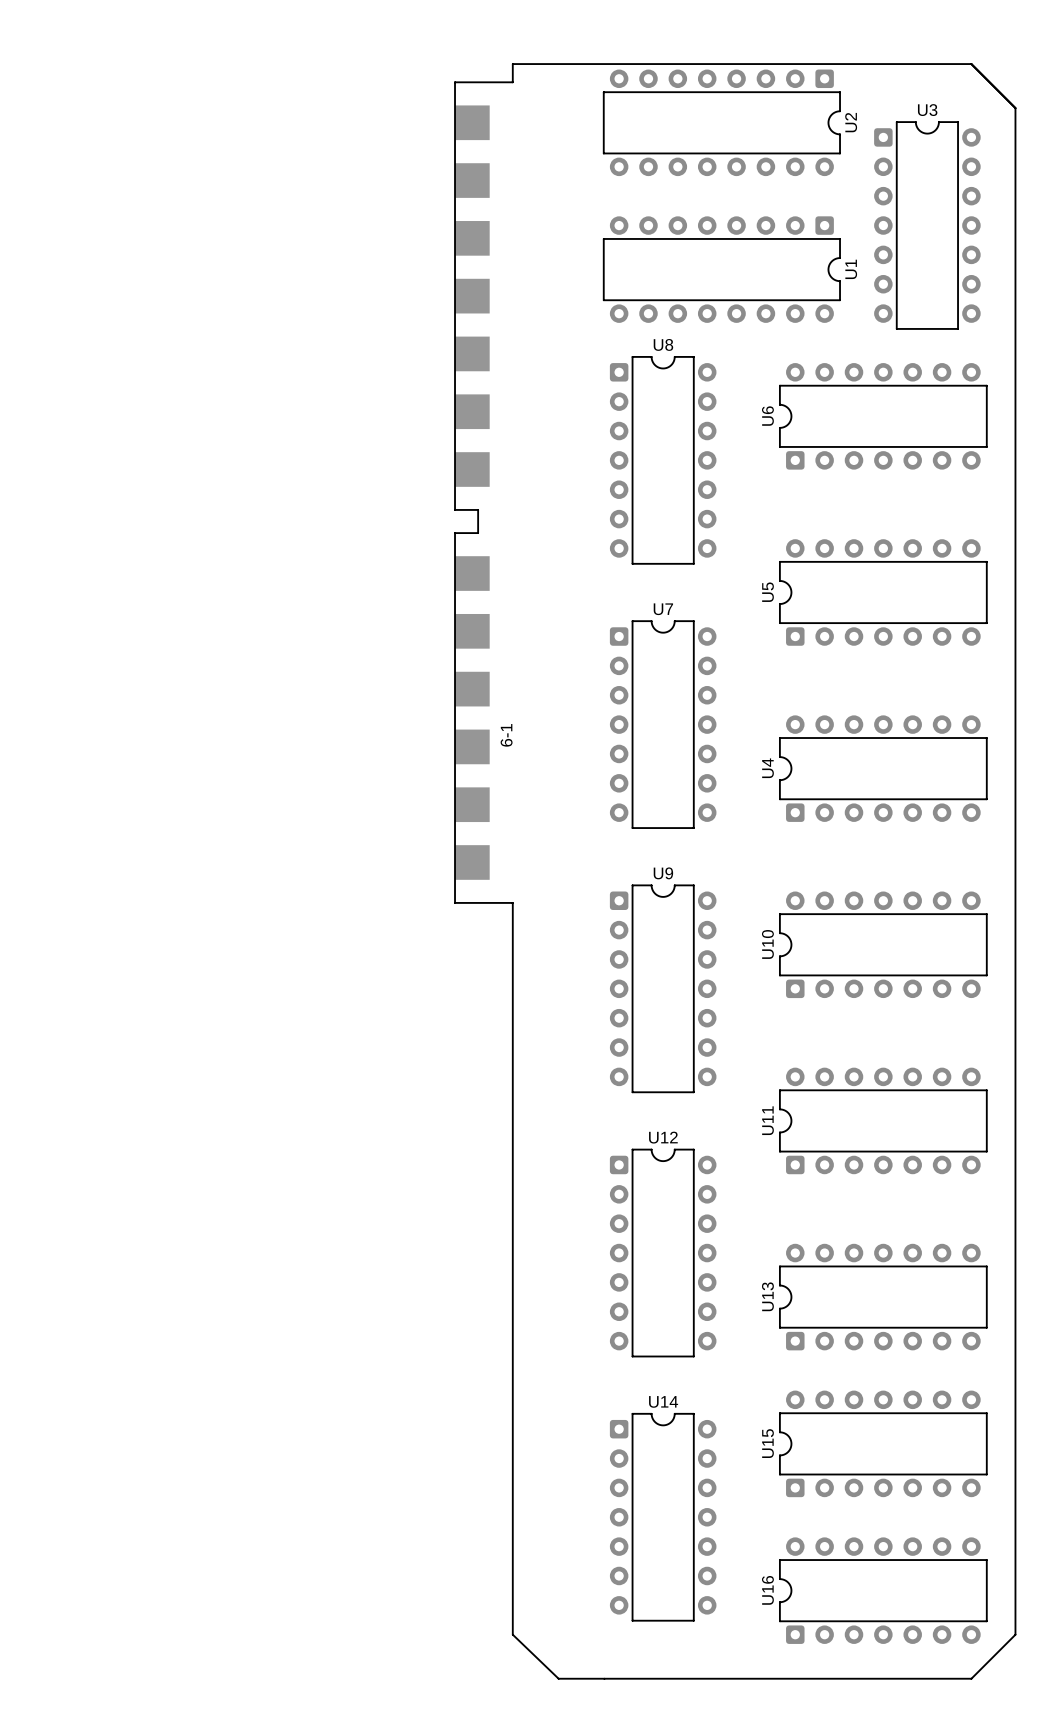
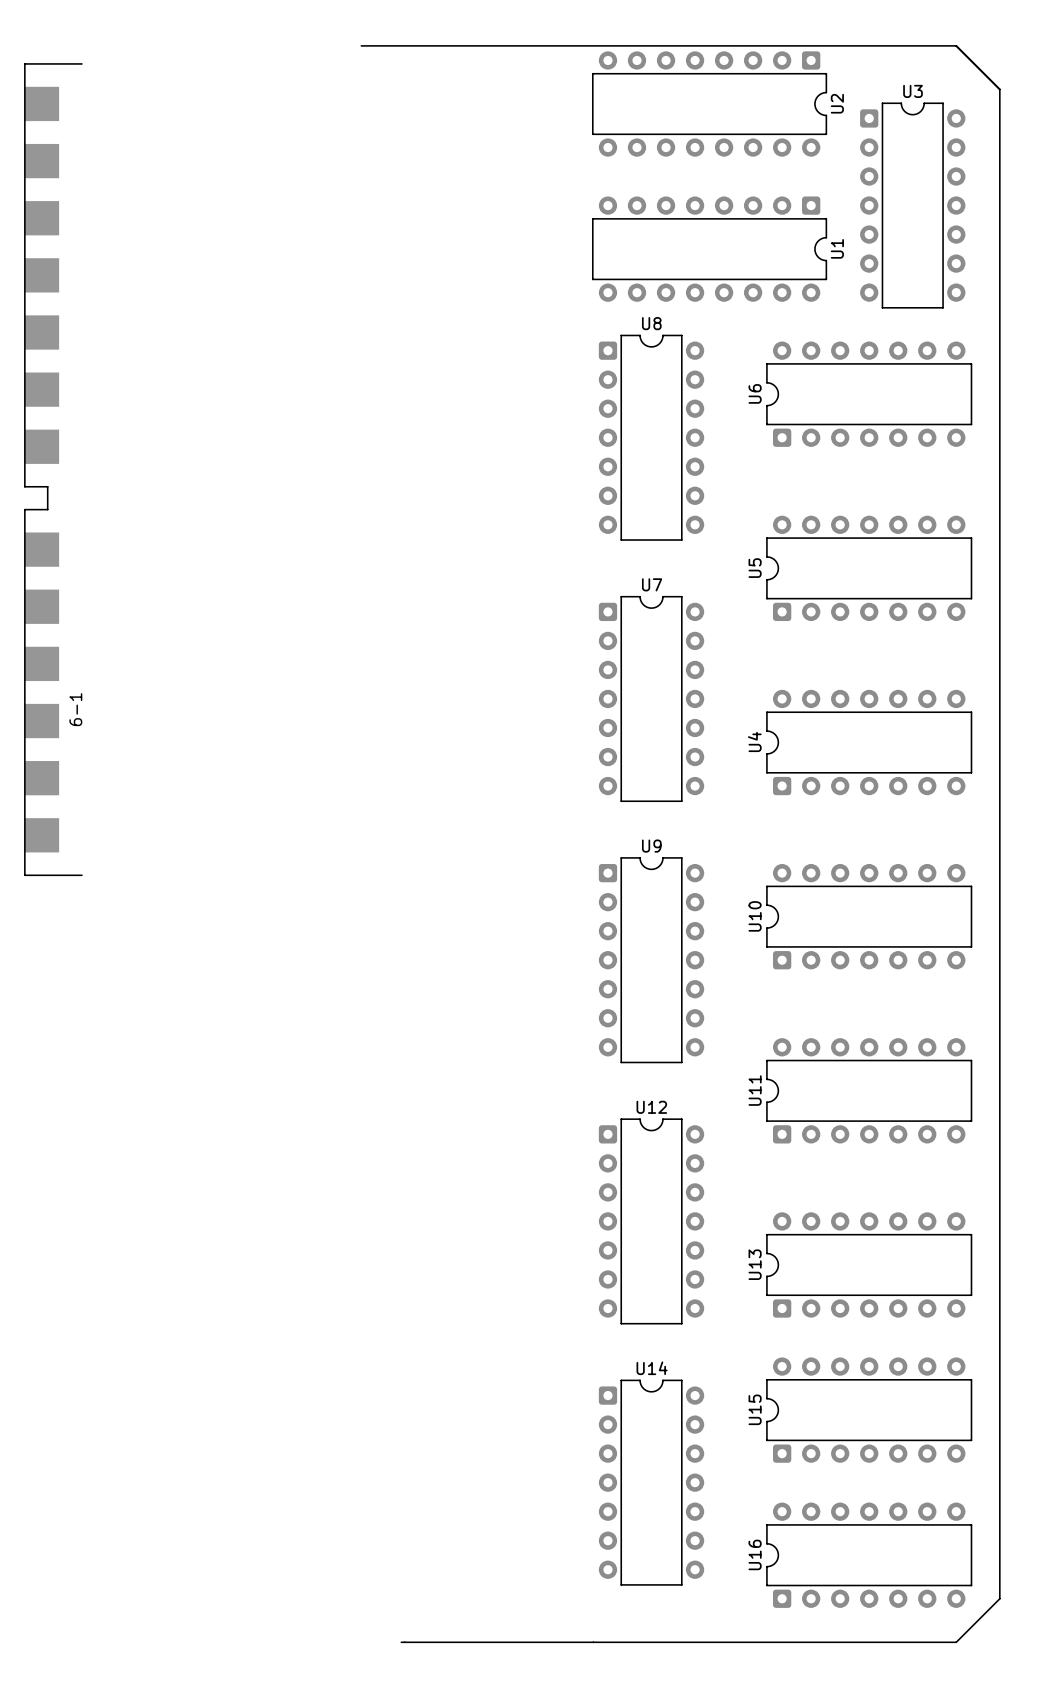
board edge: (512, 64) (512, 82) -> (502, 45) (361, 45)
6-1 position: (483, 492) -> (53, 469)
board edge: (512, 902) (512, 1634) (558, 1678) -> (401, 1642) (548, 1642)

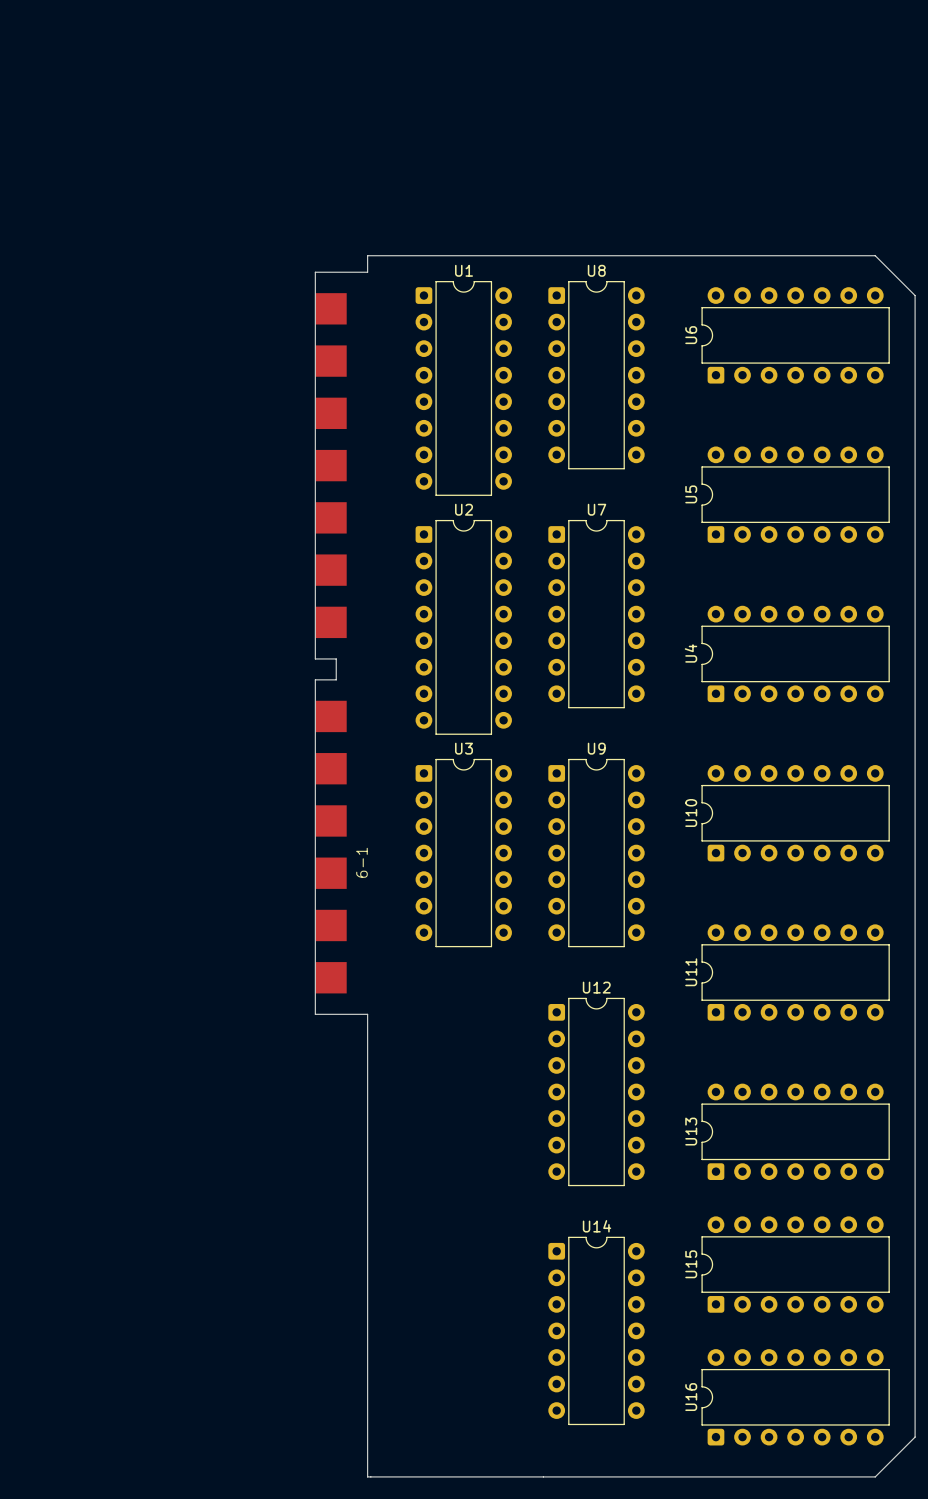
board edge: (361, 45) (956, 45) (999, 89) (999, 350) -> (367, 272) (367, 255) (875, 255) (915, 295)
U2 rotation: 0° (709, 104) -> 90° counterclockwise (463, 627)
U2 position: (709, 104) -> (463, 627)
U3 position: (912, 205) -> (463, 853)
U1 rotation: 0° (709, 249) -> 90° counterclockwise (463, 388)
U1 position: (709, 249) -> (463, 388)
6-1 position: (53, 469) -> (341, 643)
board edge: none -> (367, 1014) (367, 1476)

